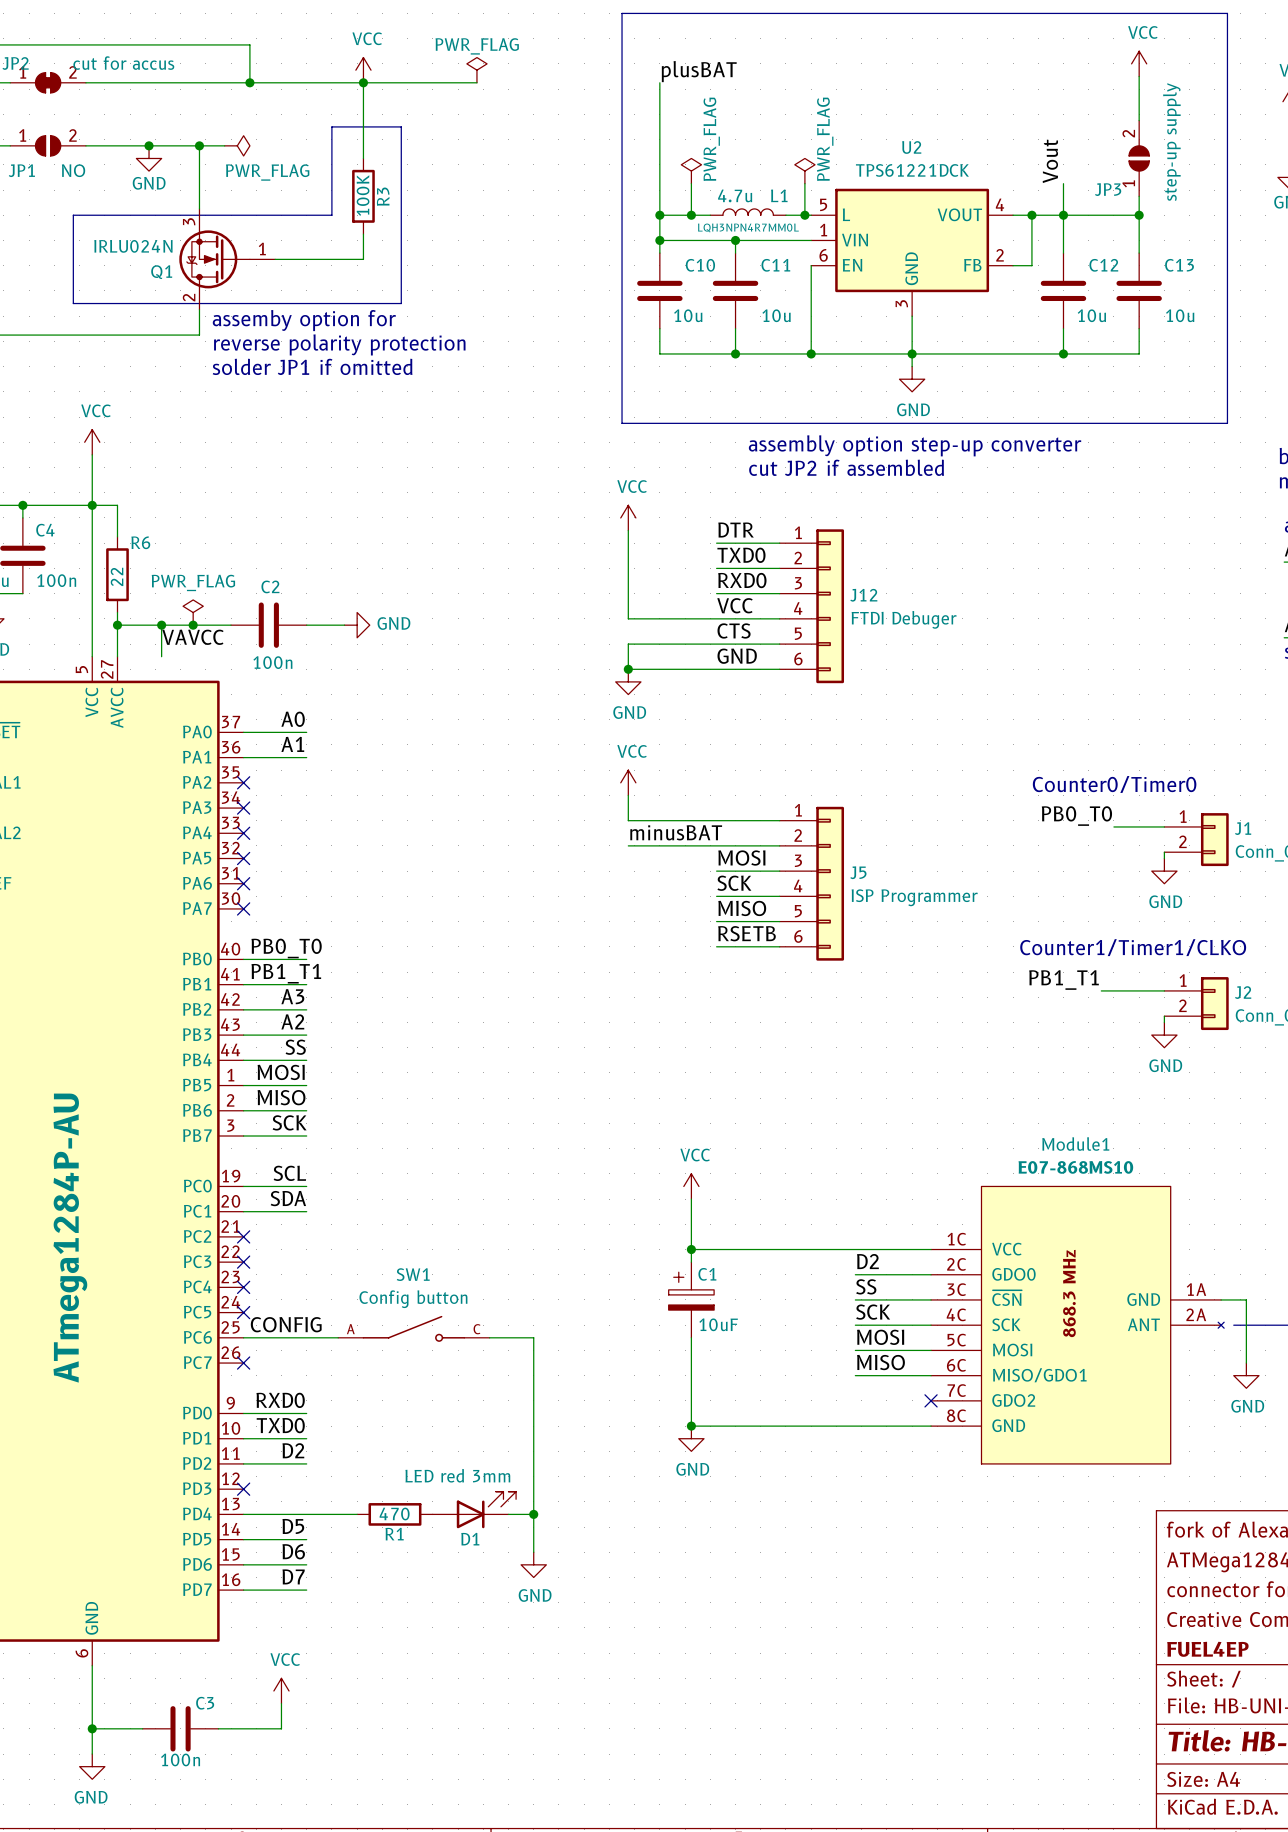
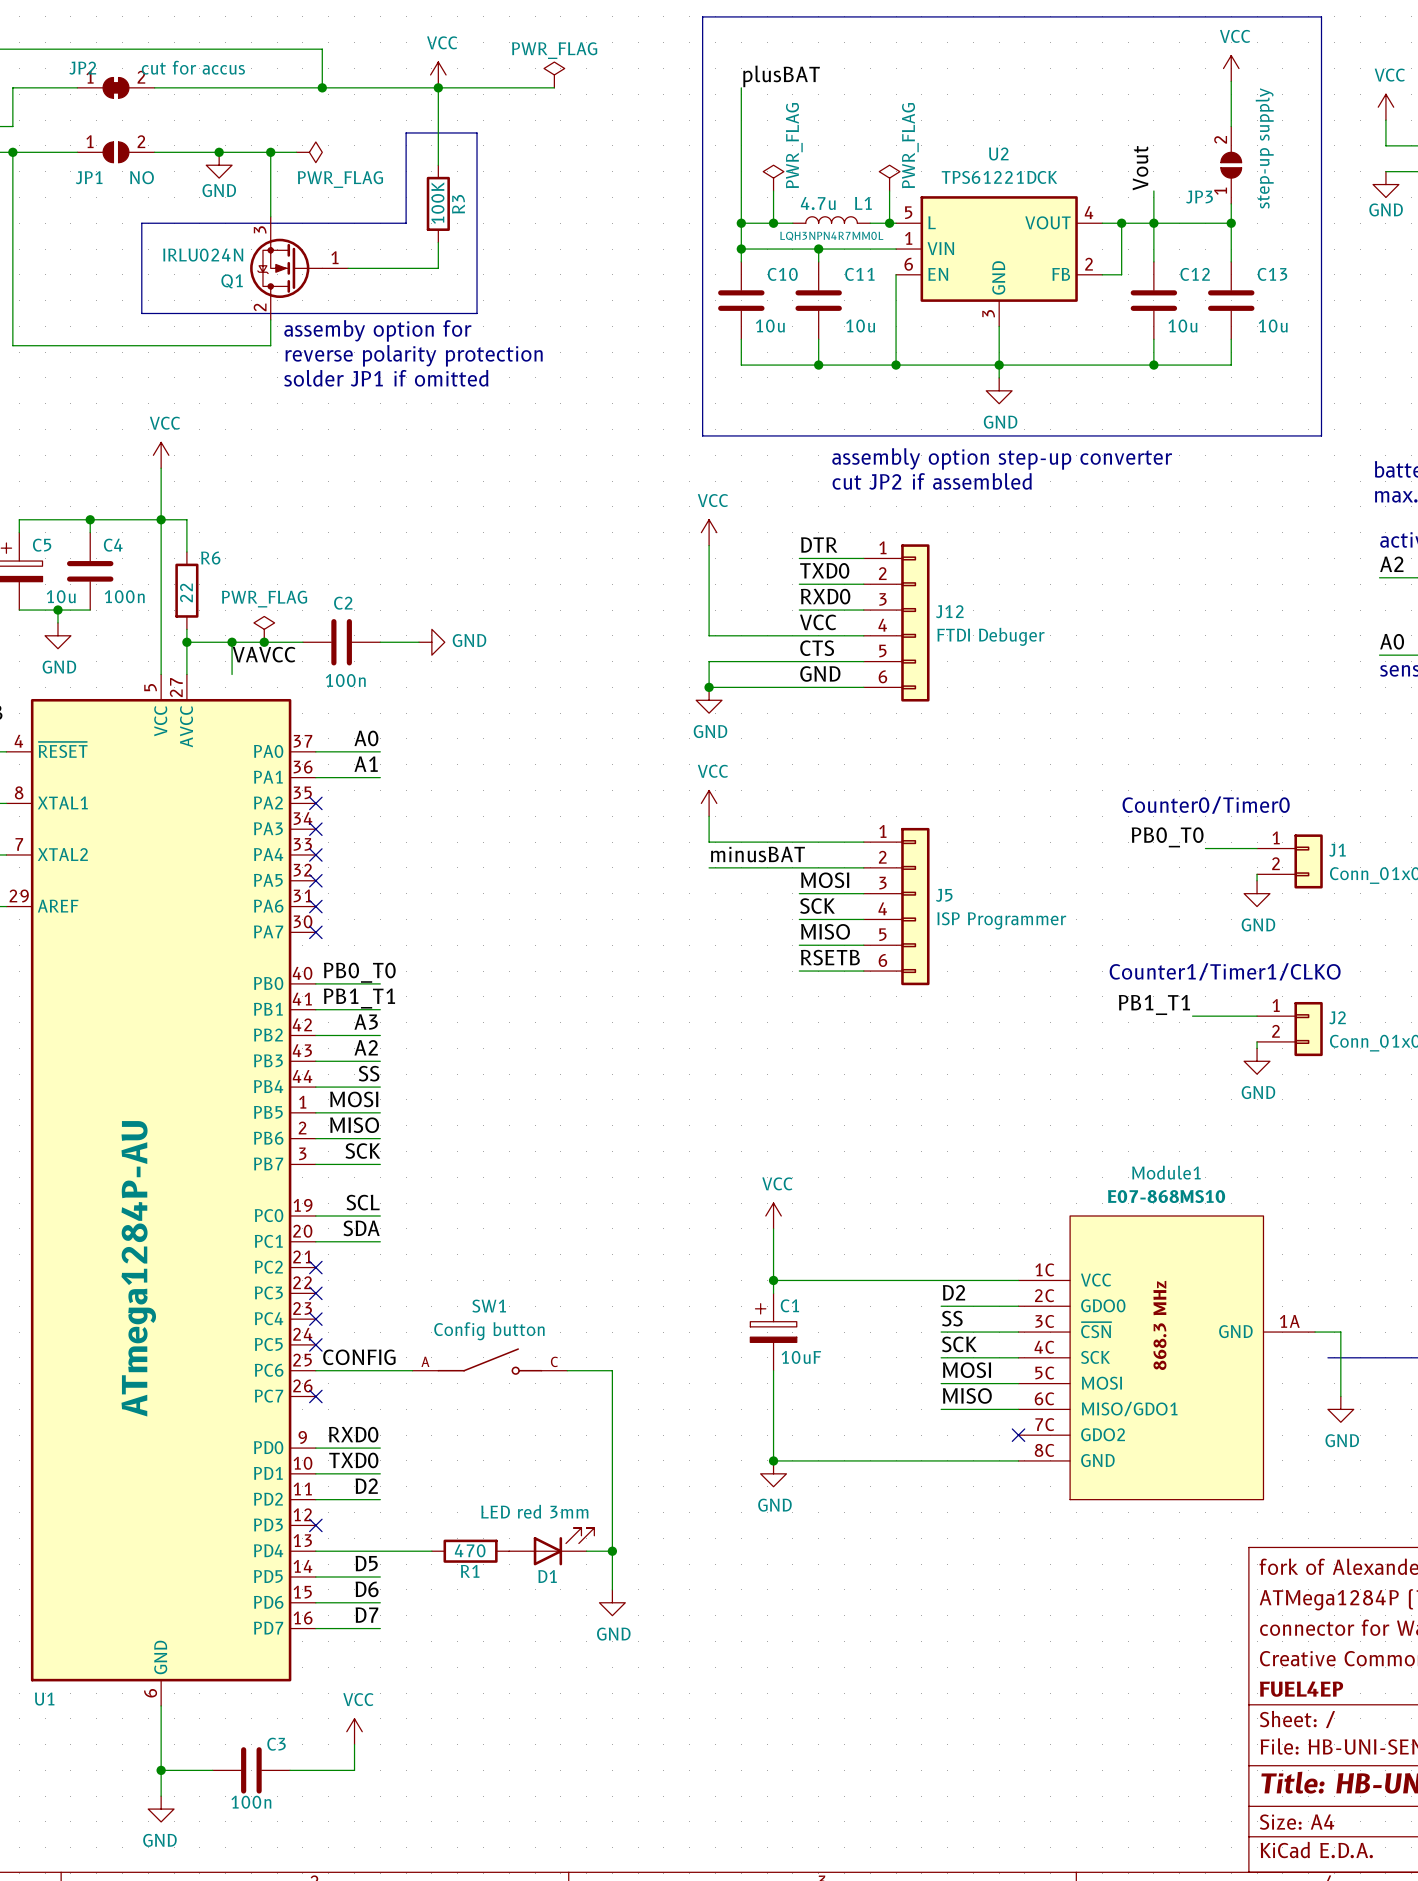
Module1 symbol: [931, 1186, 1225, 1464] -> [1018, 1215, 1316, 1500]

